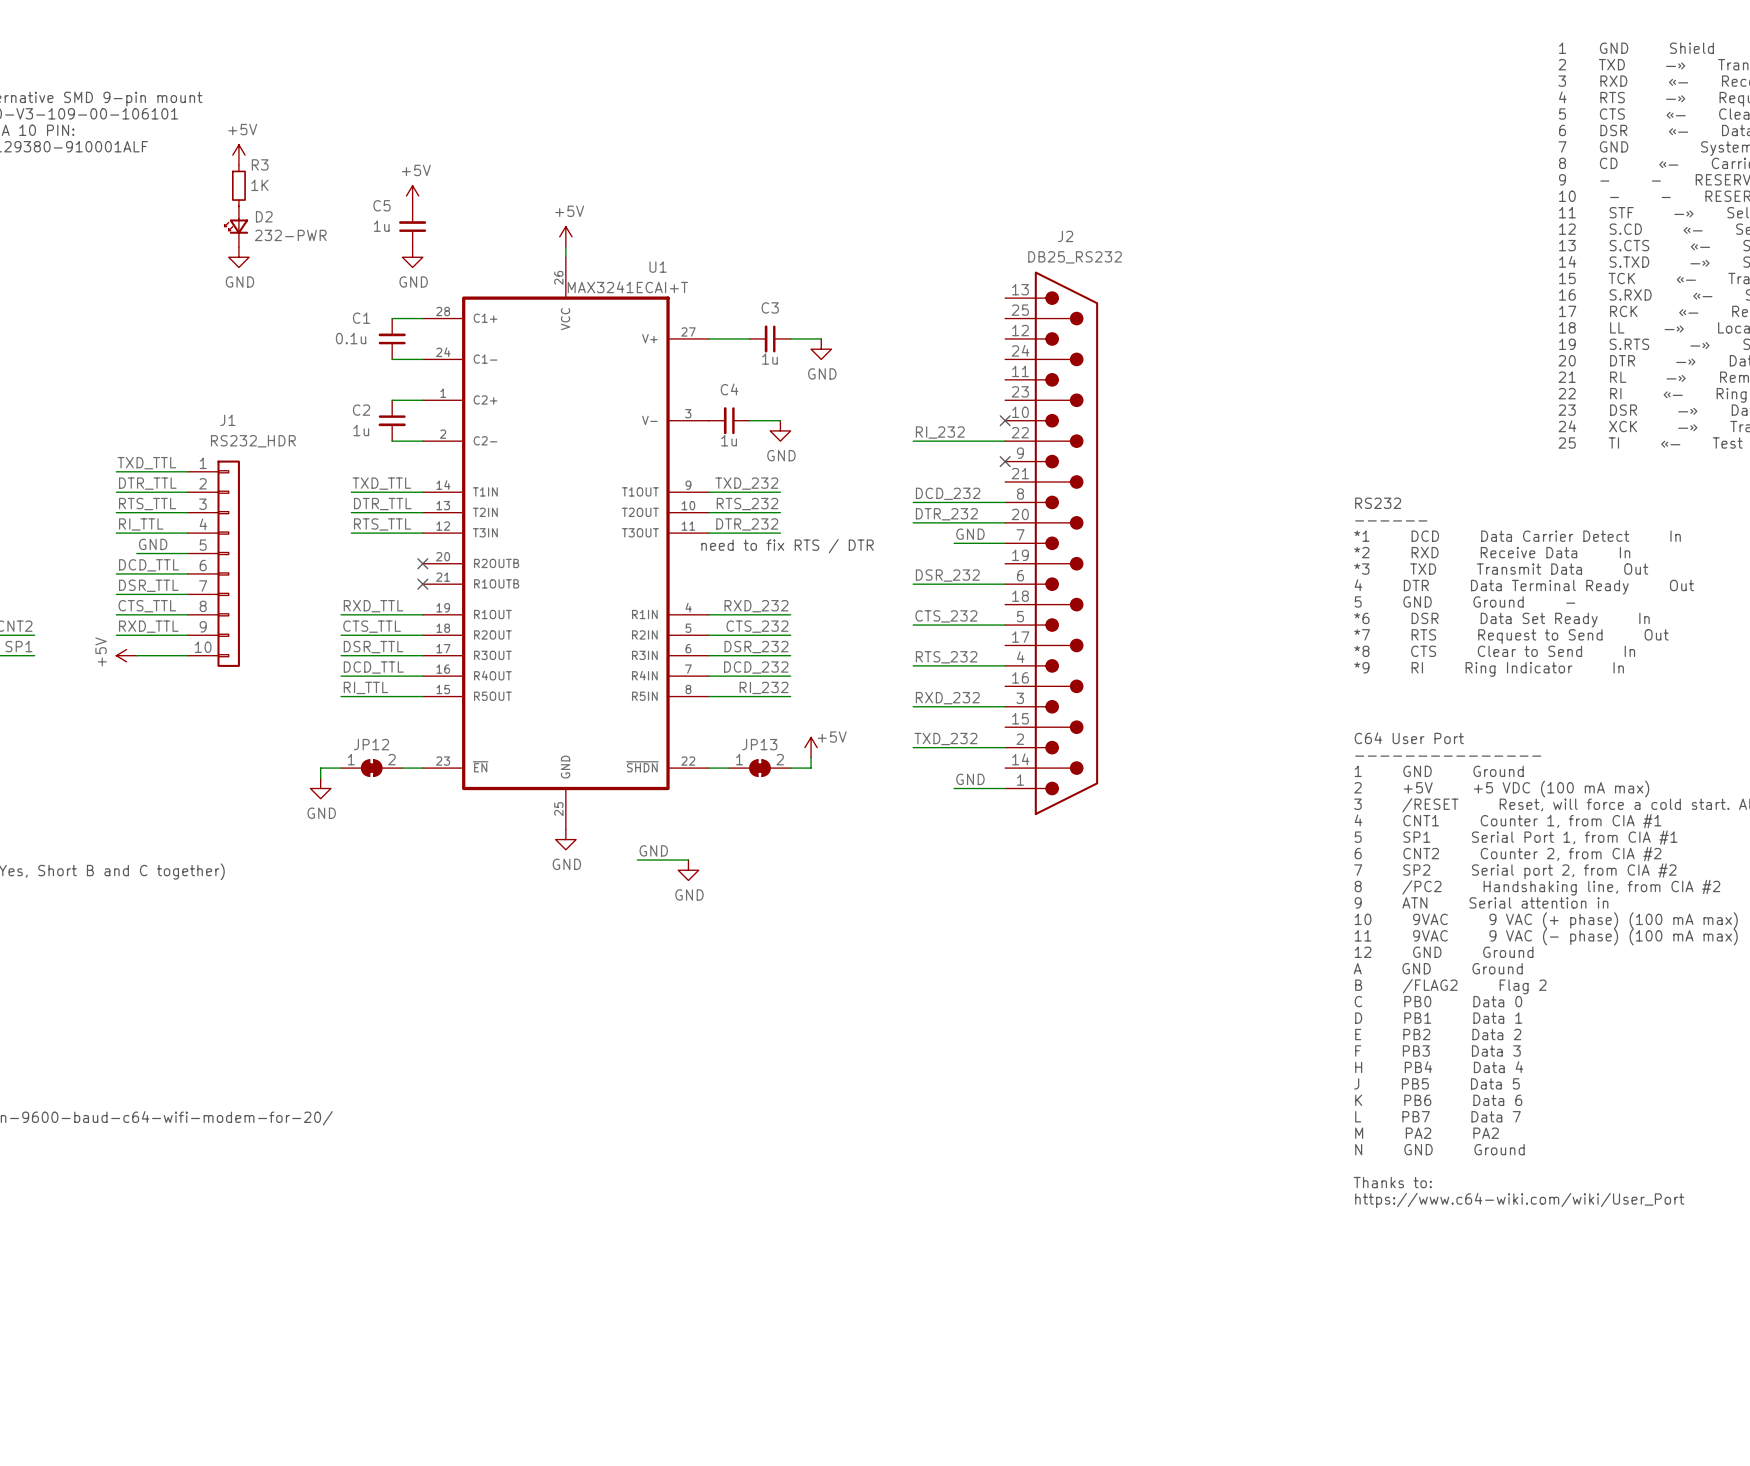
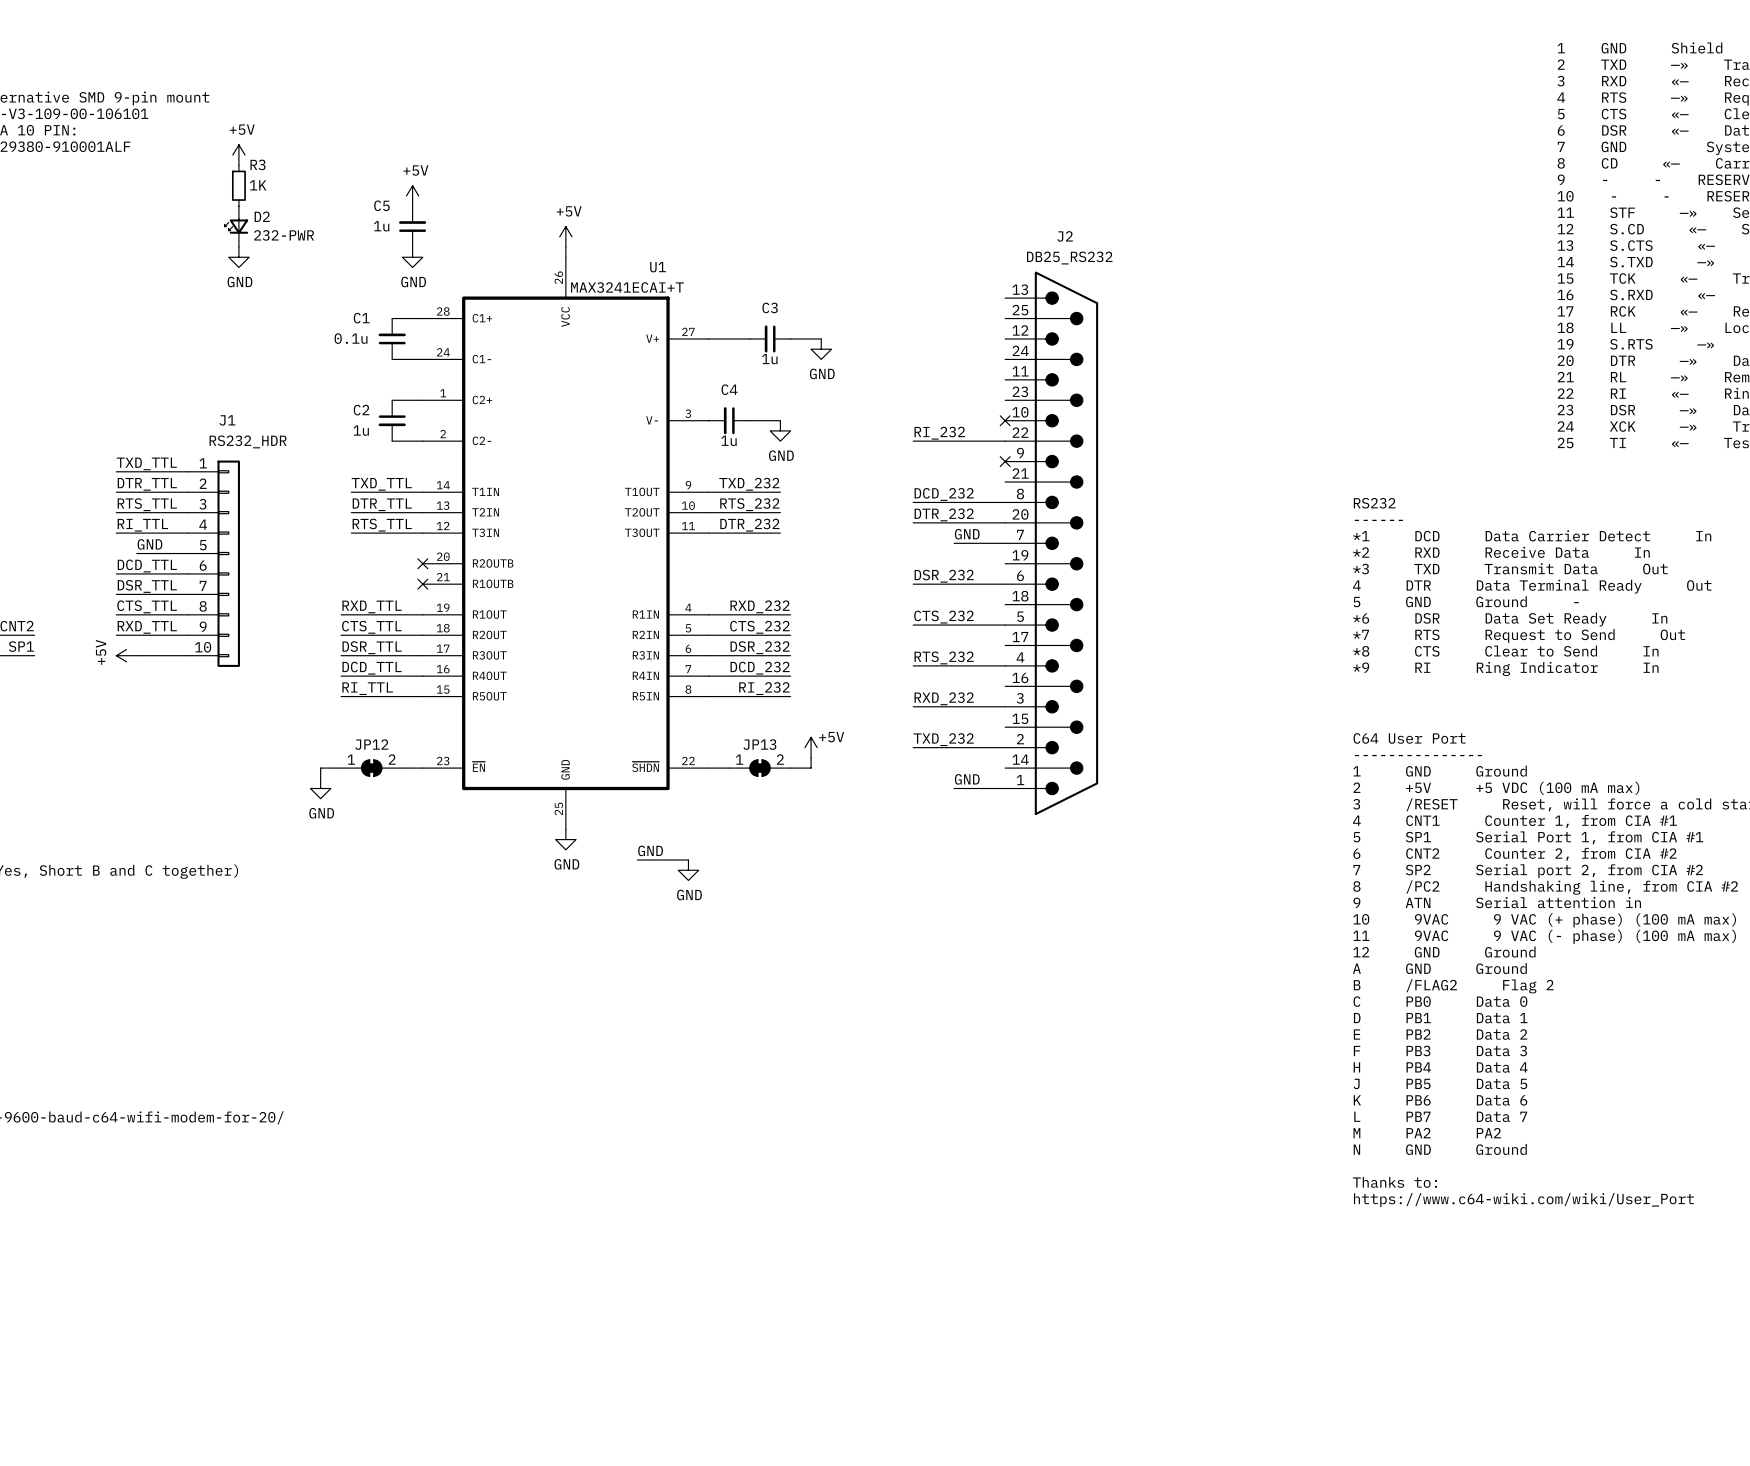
text: need to fix RTS / DTR (787, 546) -> none

